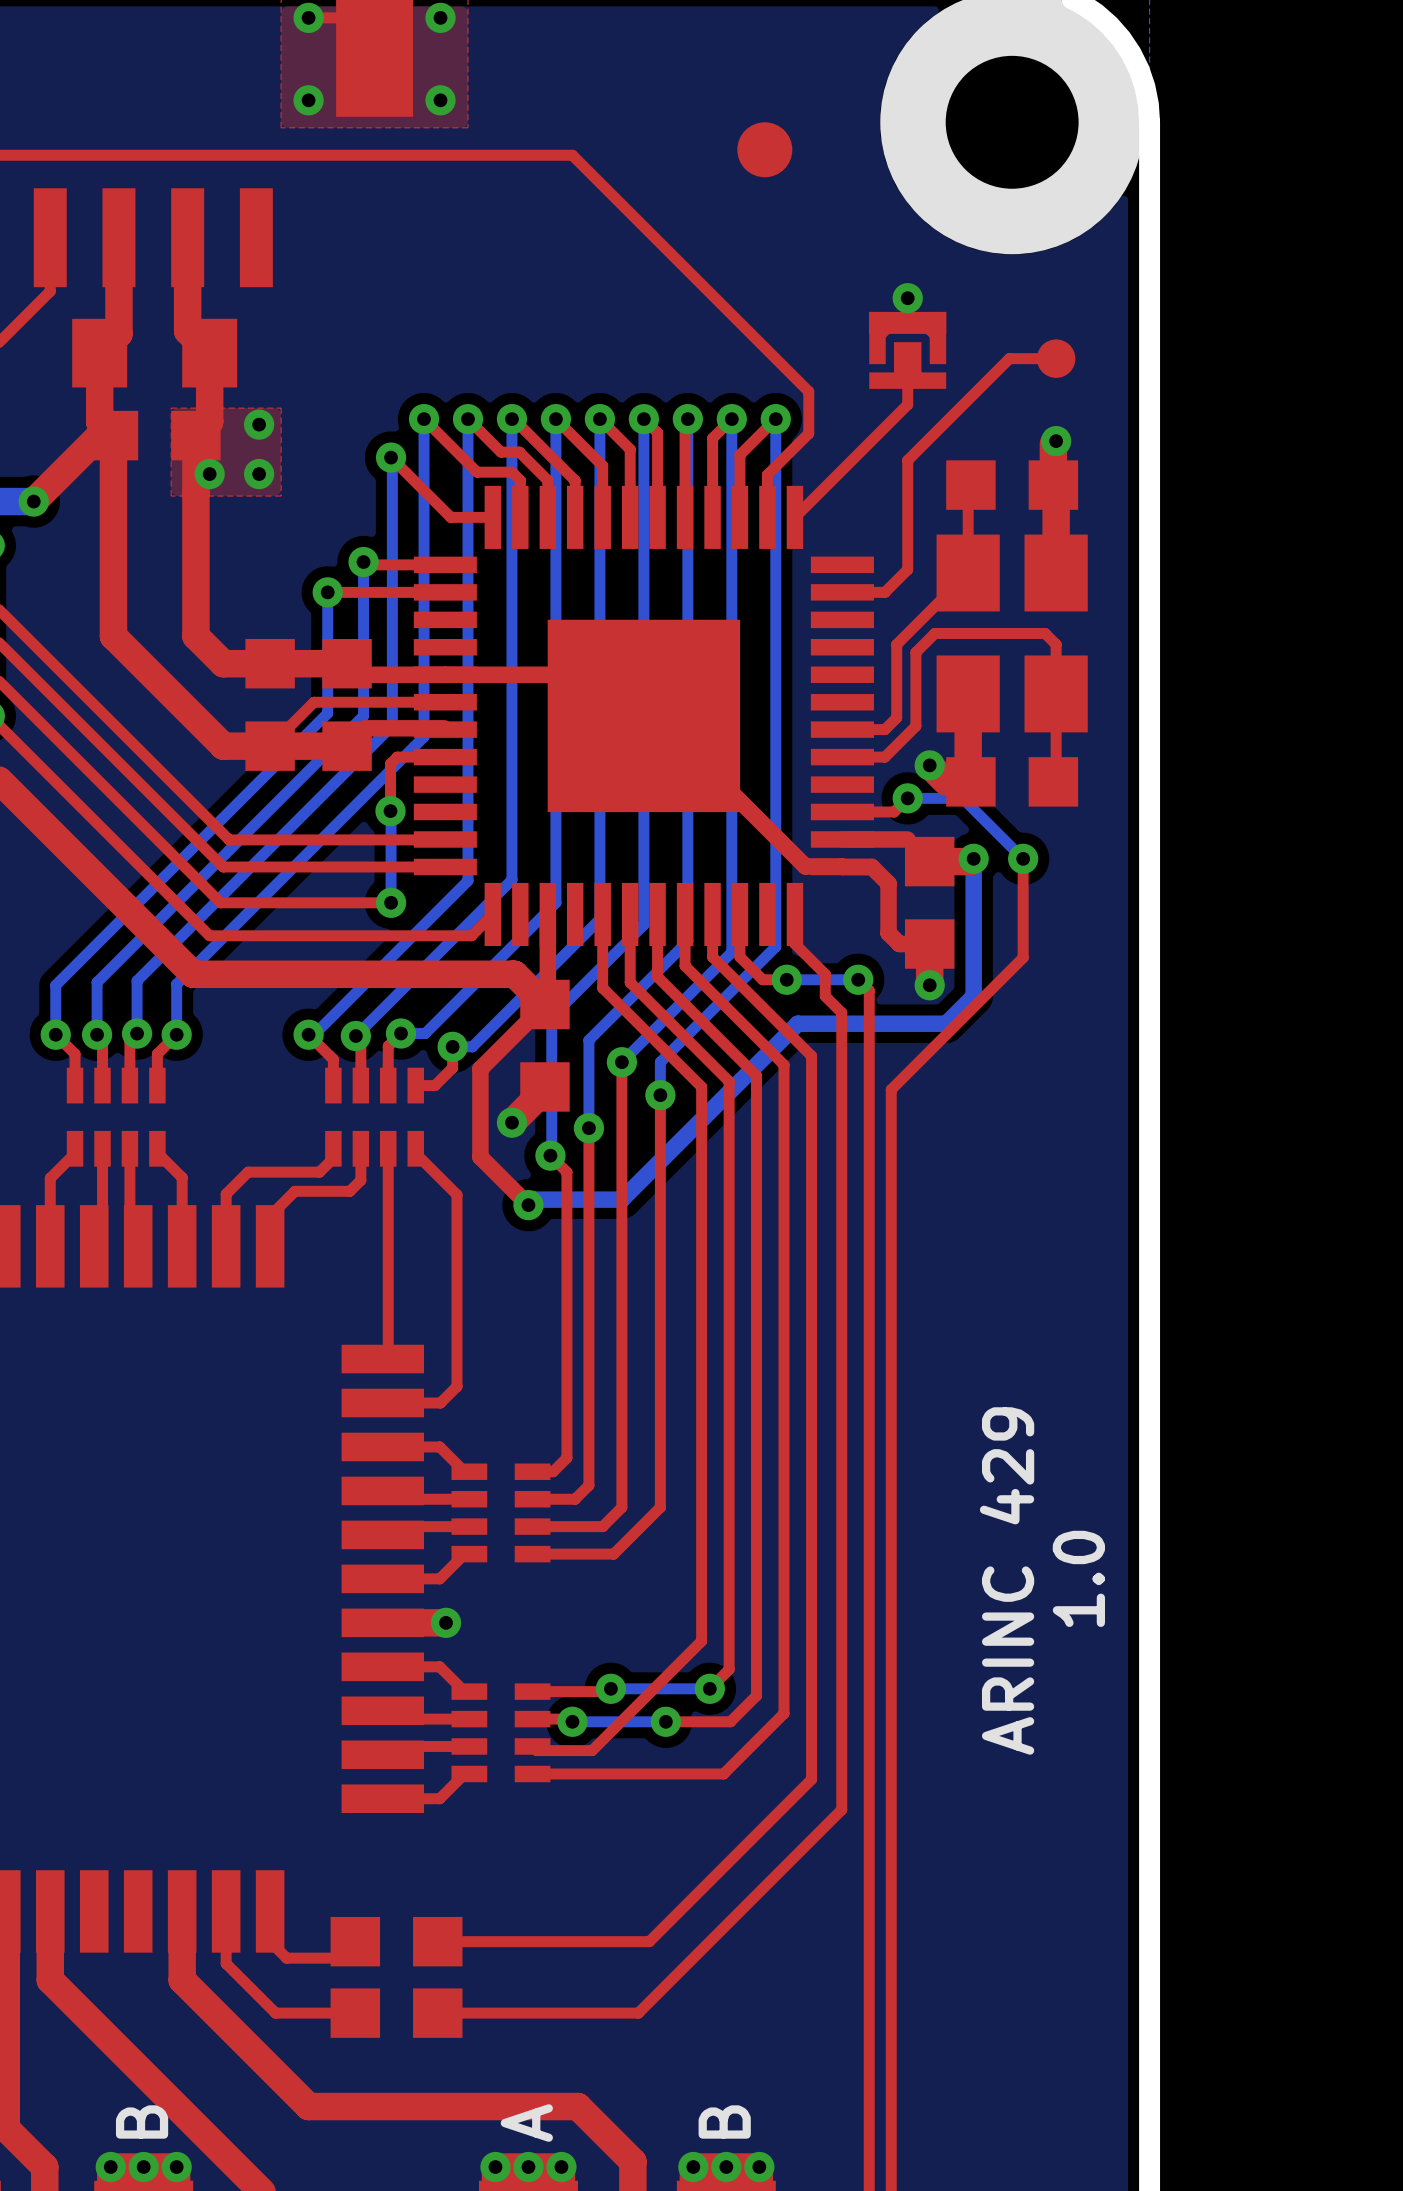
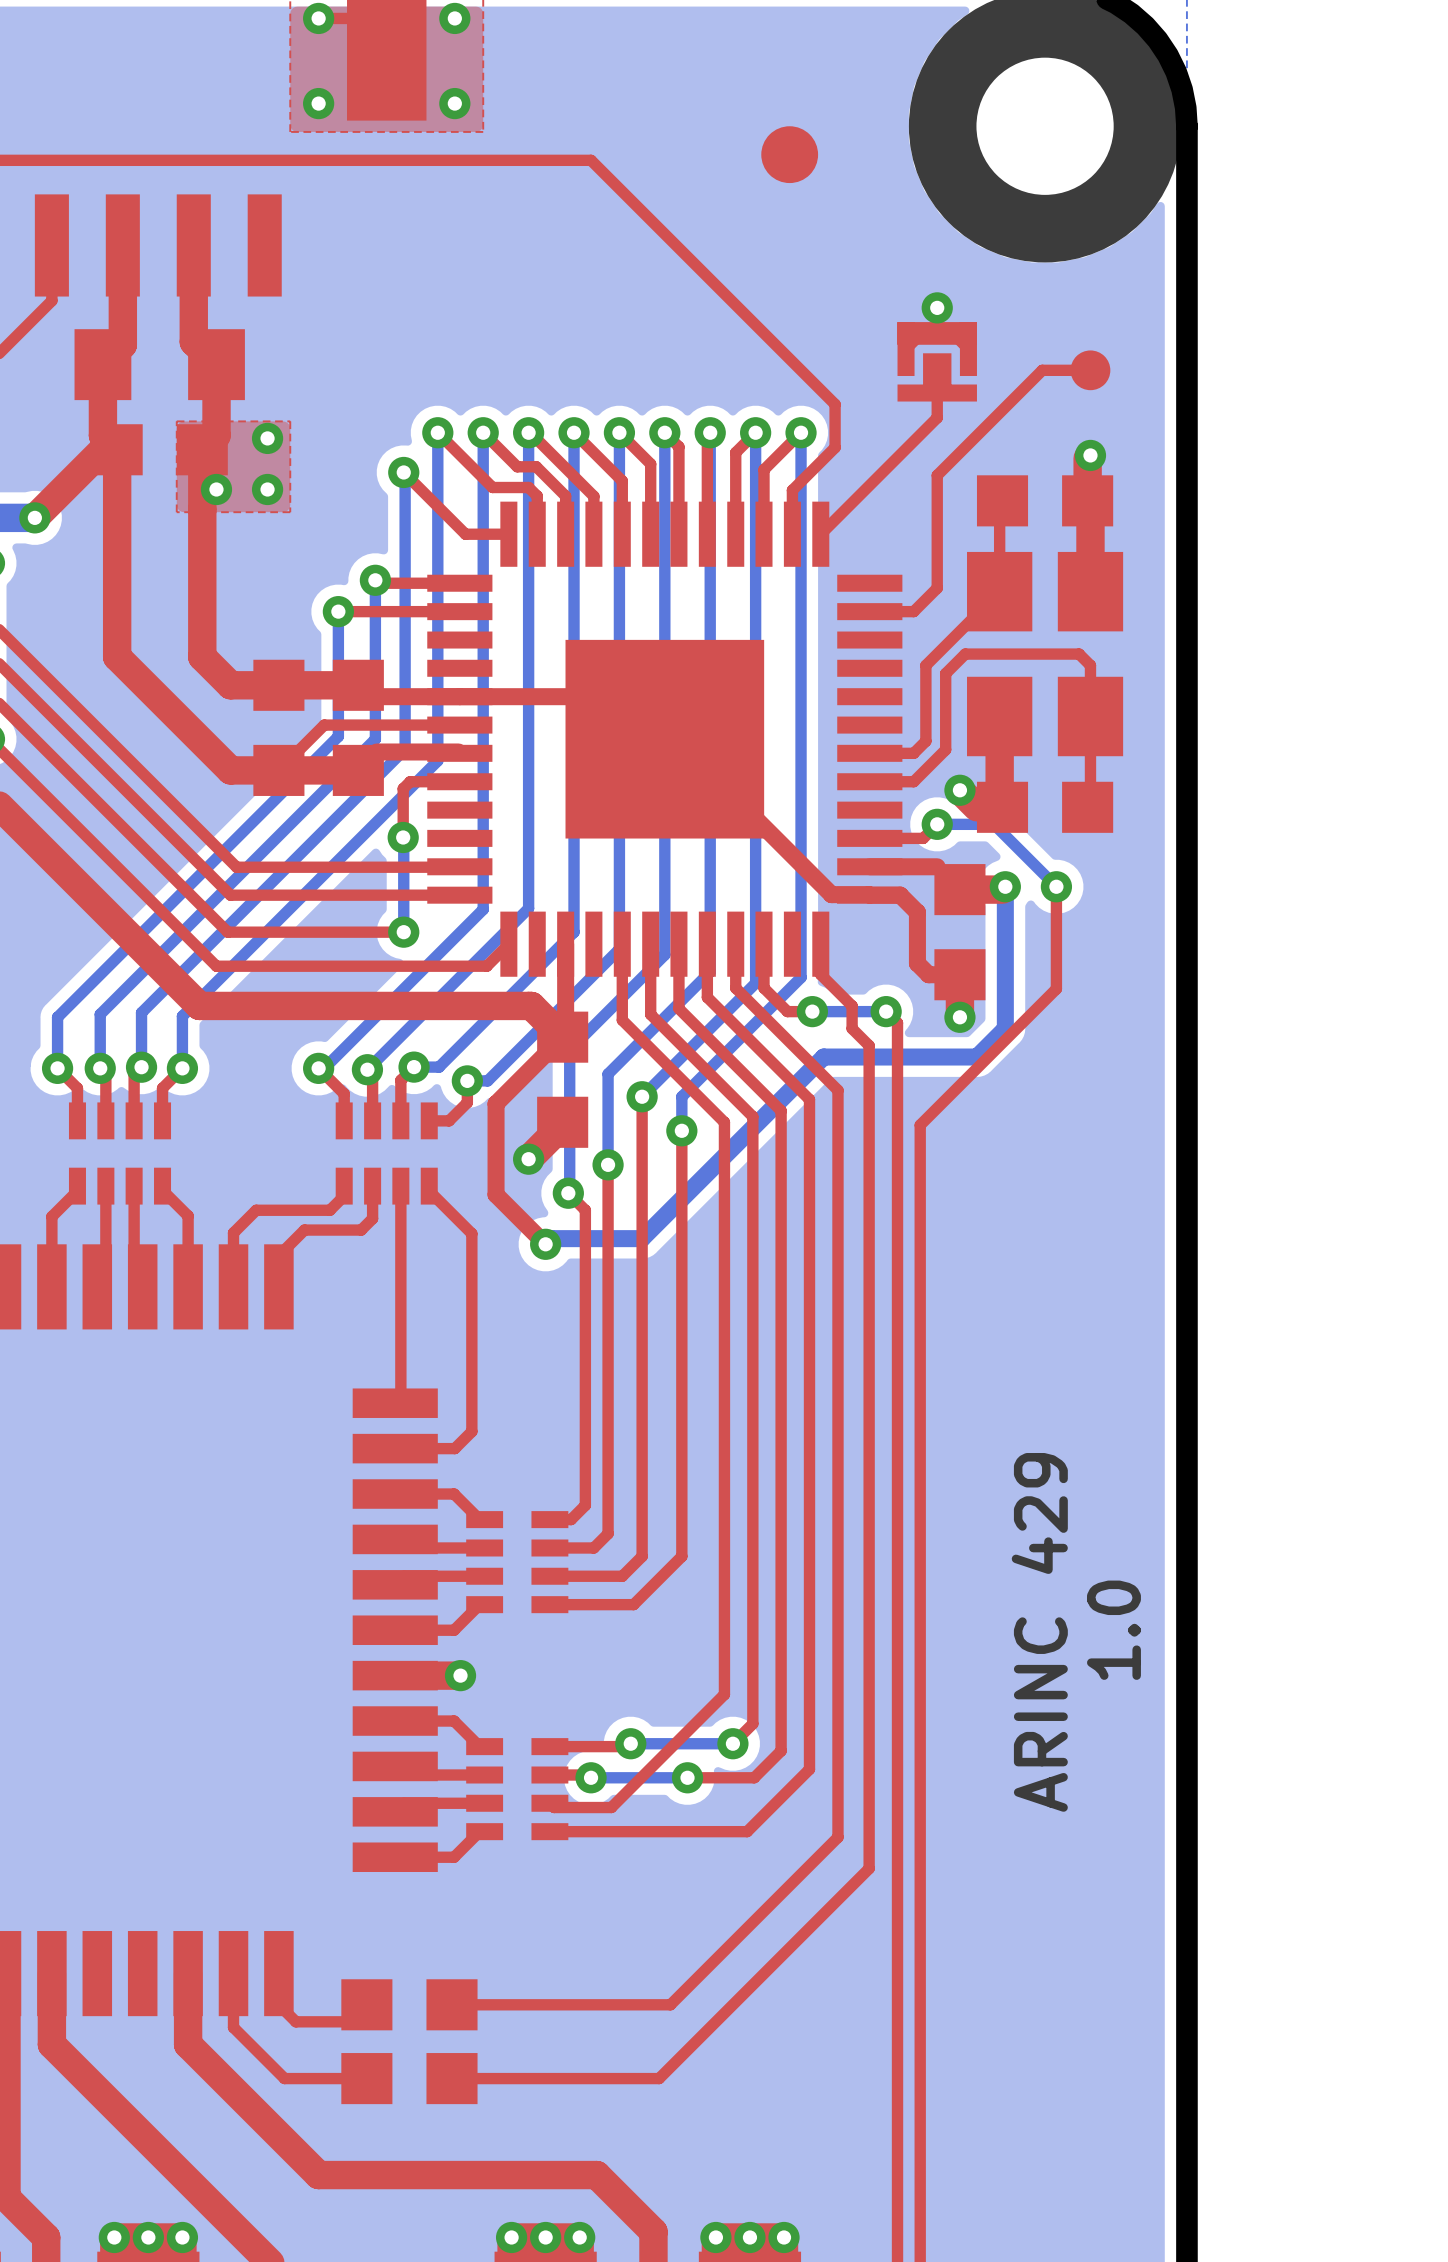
text: B (142, 2122) -> none
text: B (724, 2122) -> none
text: A (526, 2123) -> none

